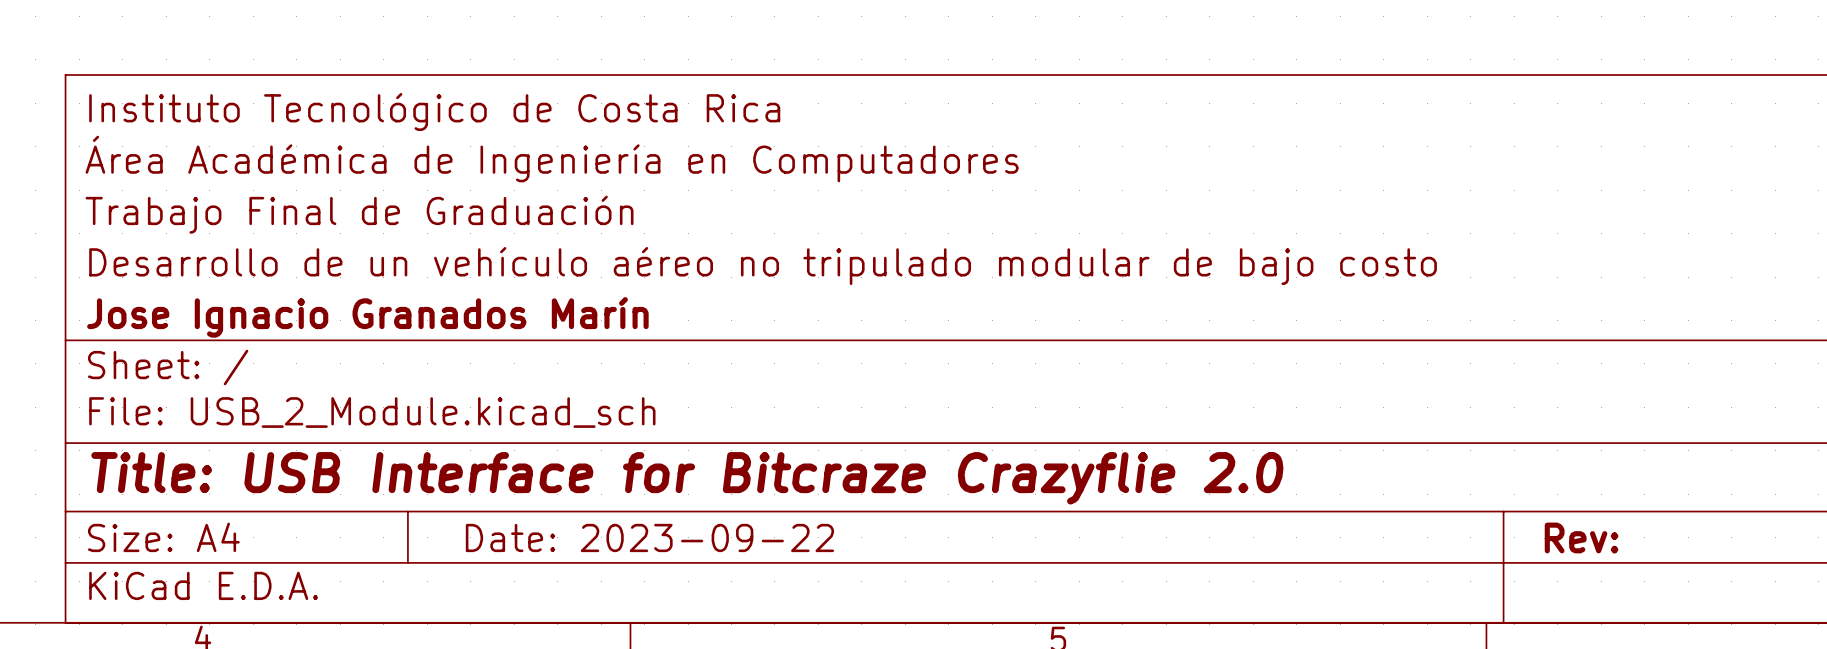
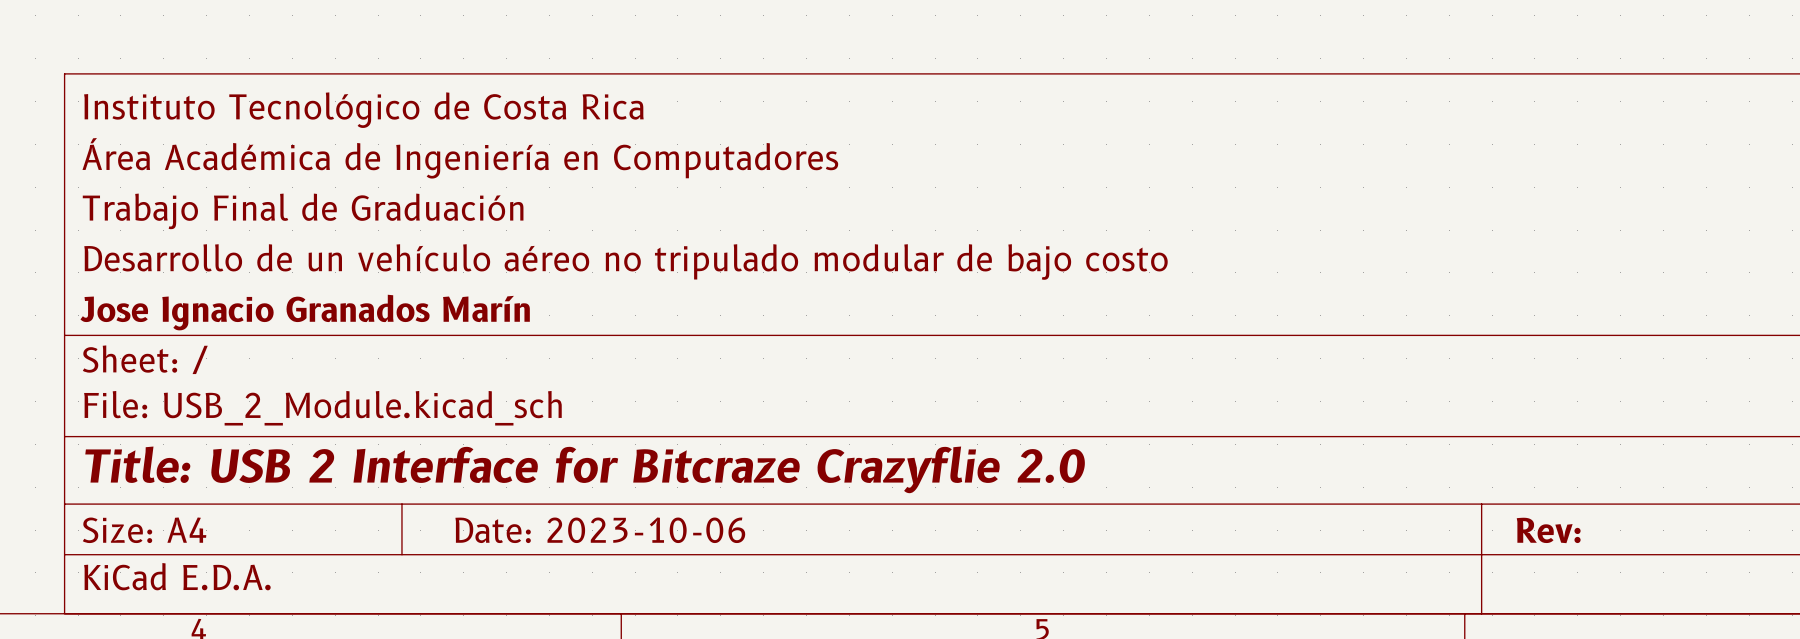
title block: Title: USB Interface for Bitcraze Crazyflie 2.0 (687, 478) -> Title: USB 2 Interface for Bitcraze Crazyflie 2.0 (585, 469)
title block: Date: 2023-09-22 (649, 537) -> Date: 2023-10-06 (600, 530)

